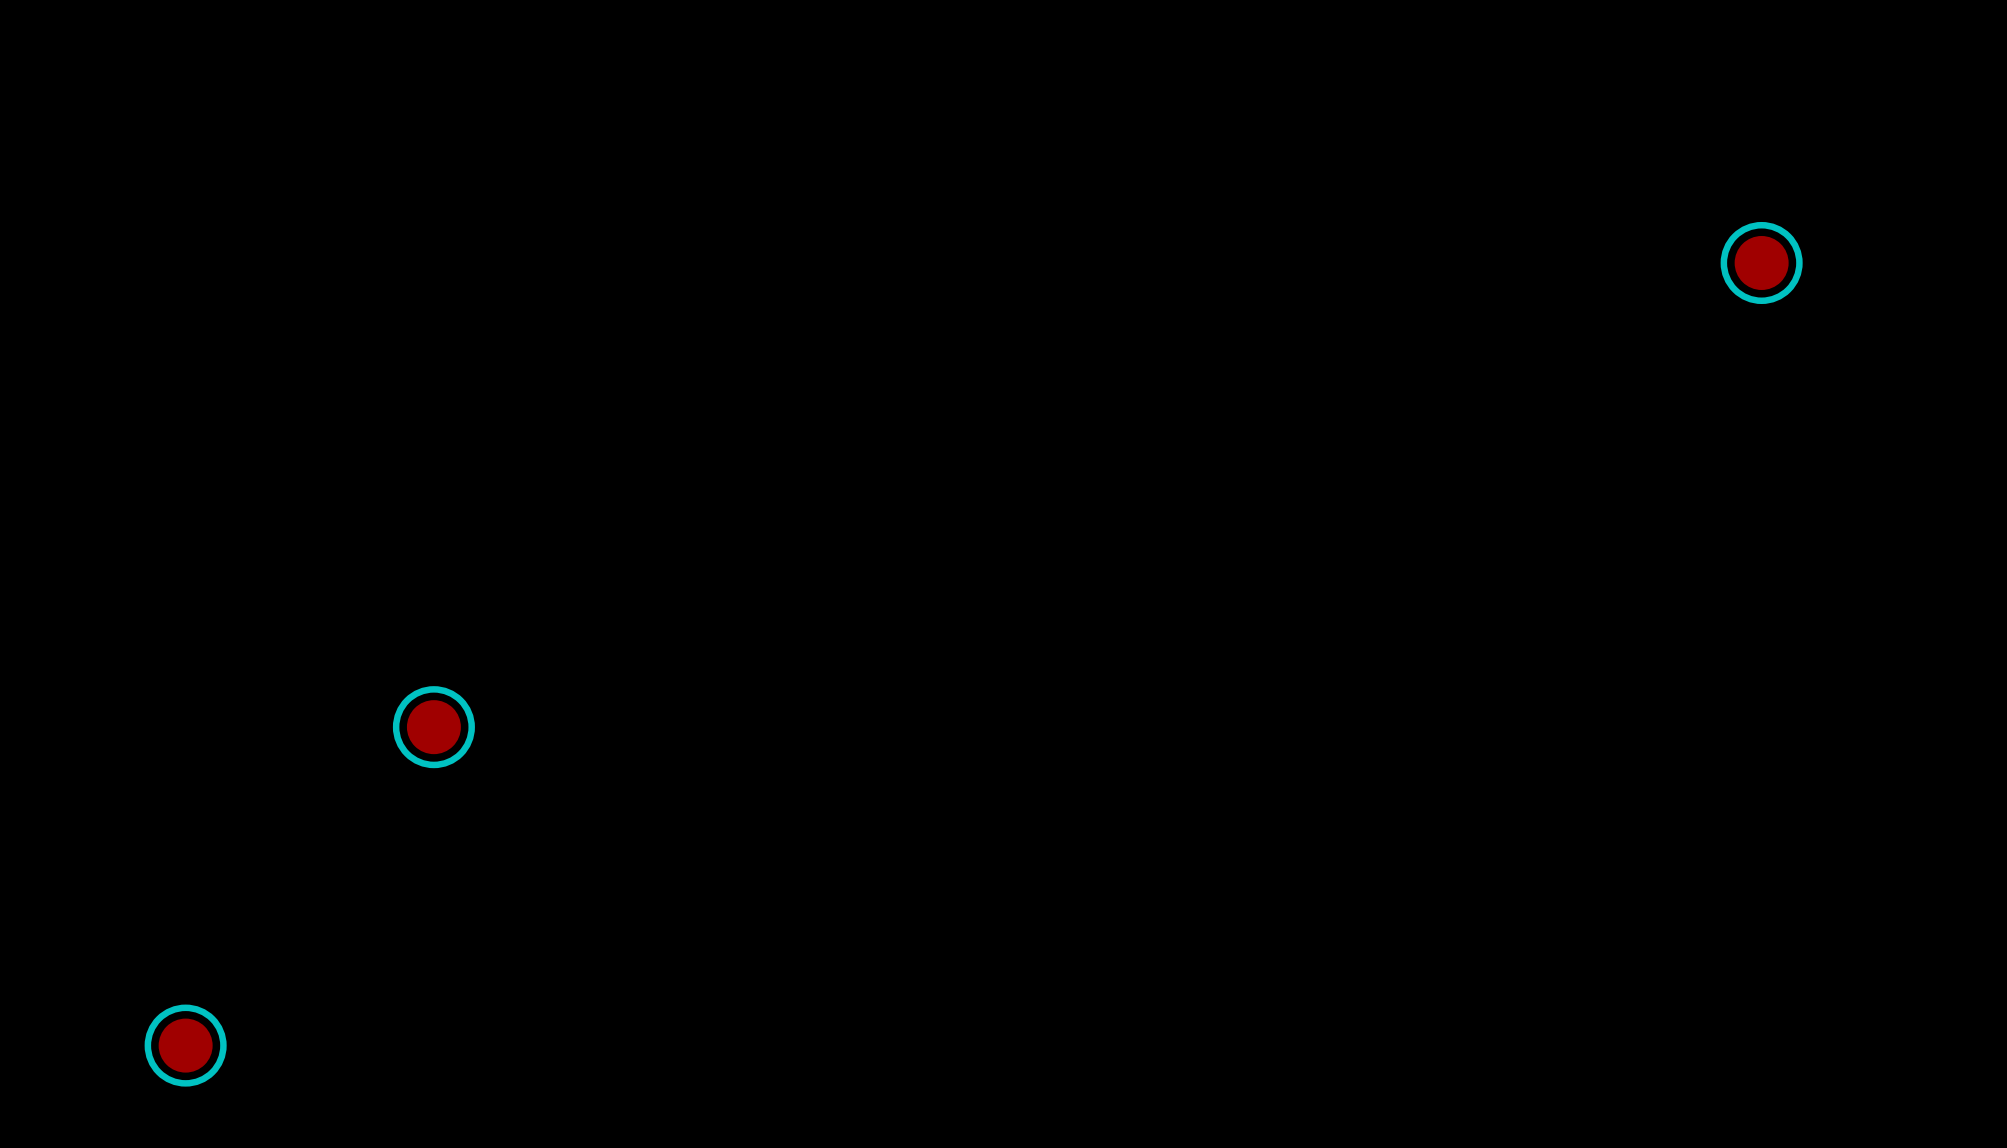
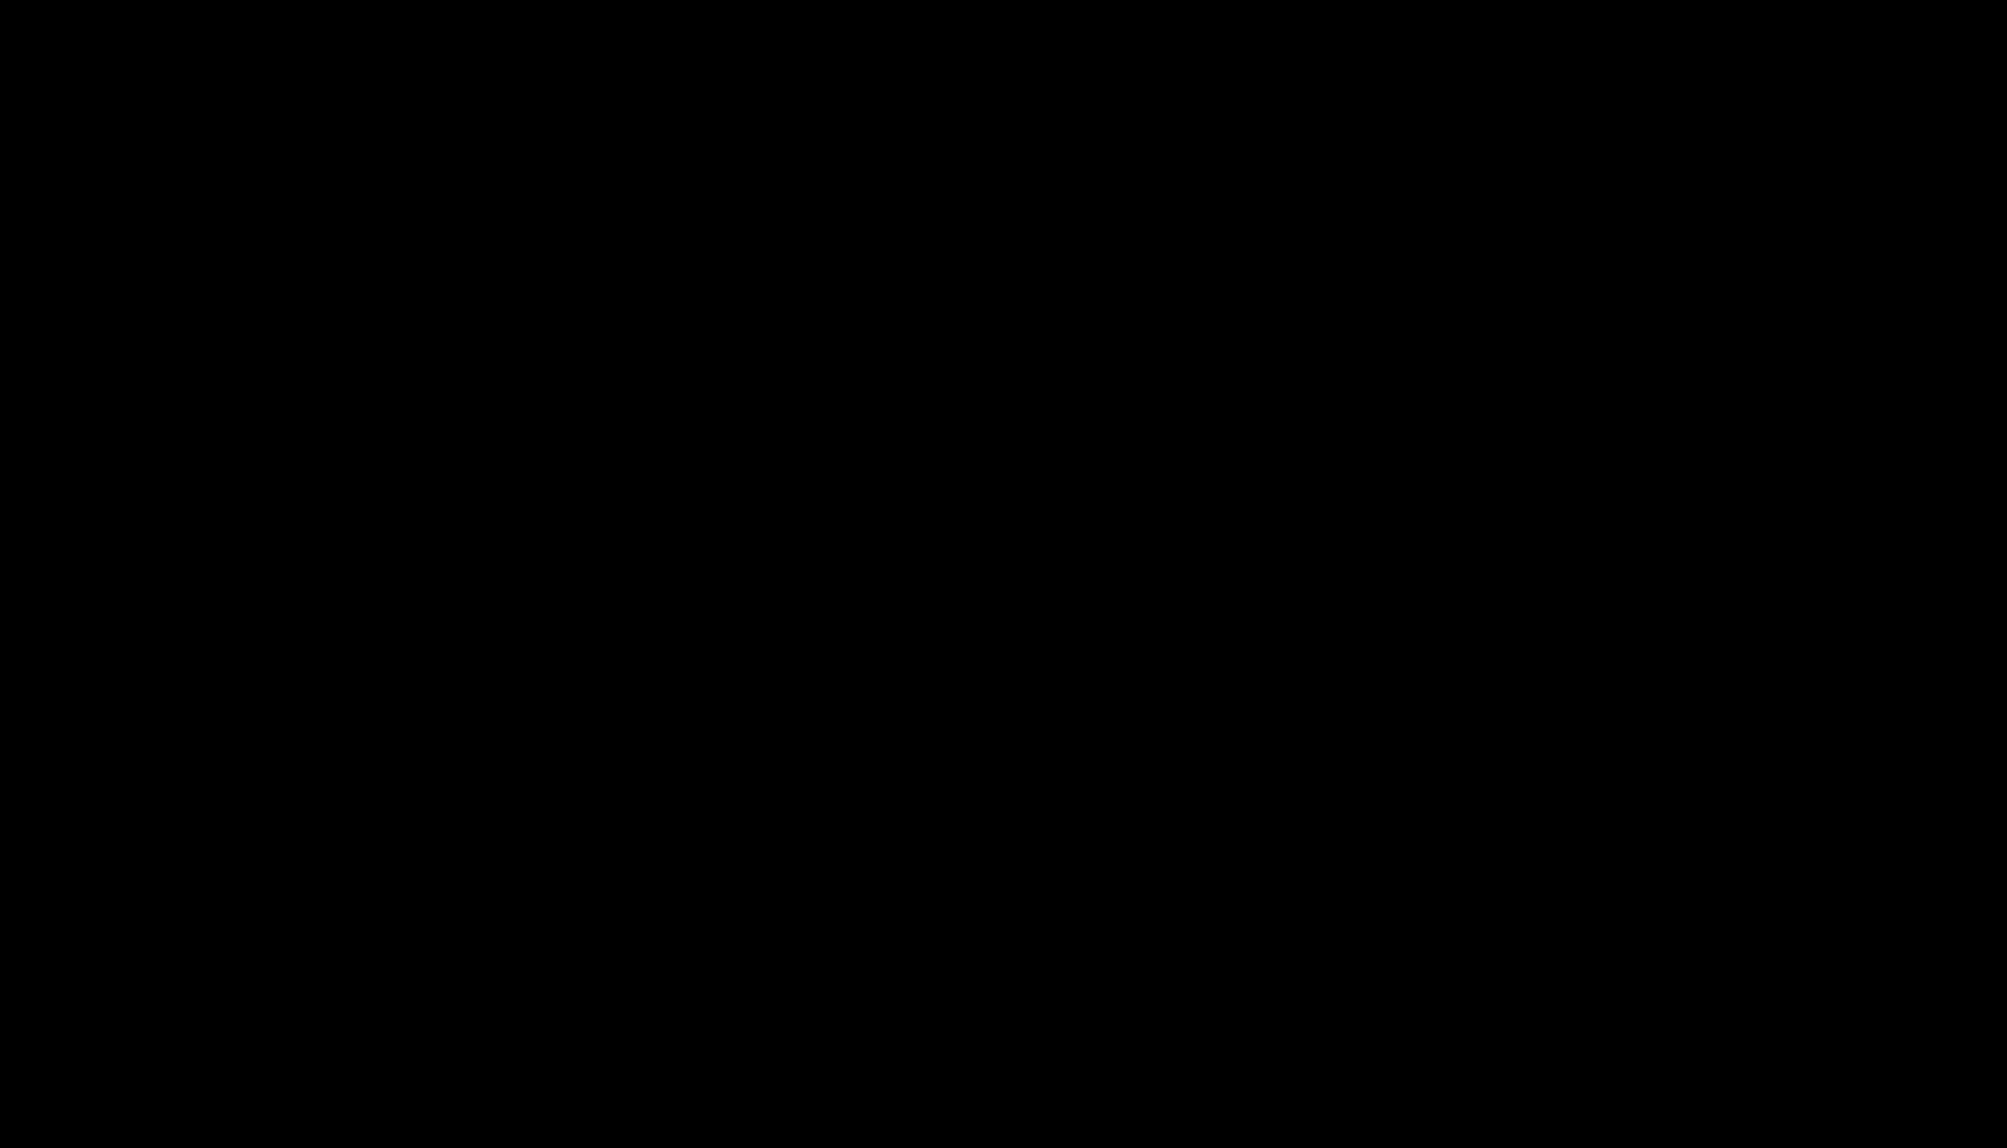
part: (1761, 262) -> none
part: (433, 727) -> none
part: (185, 1045) -> none

